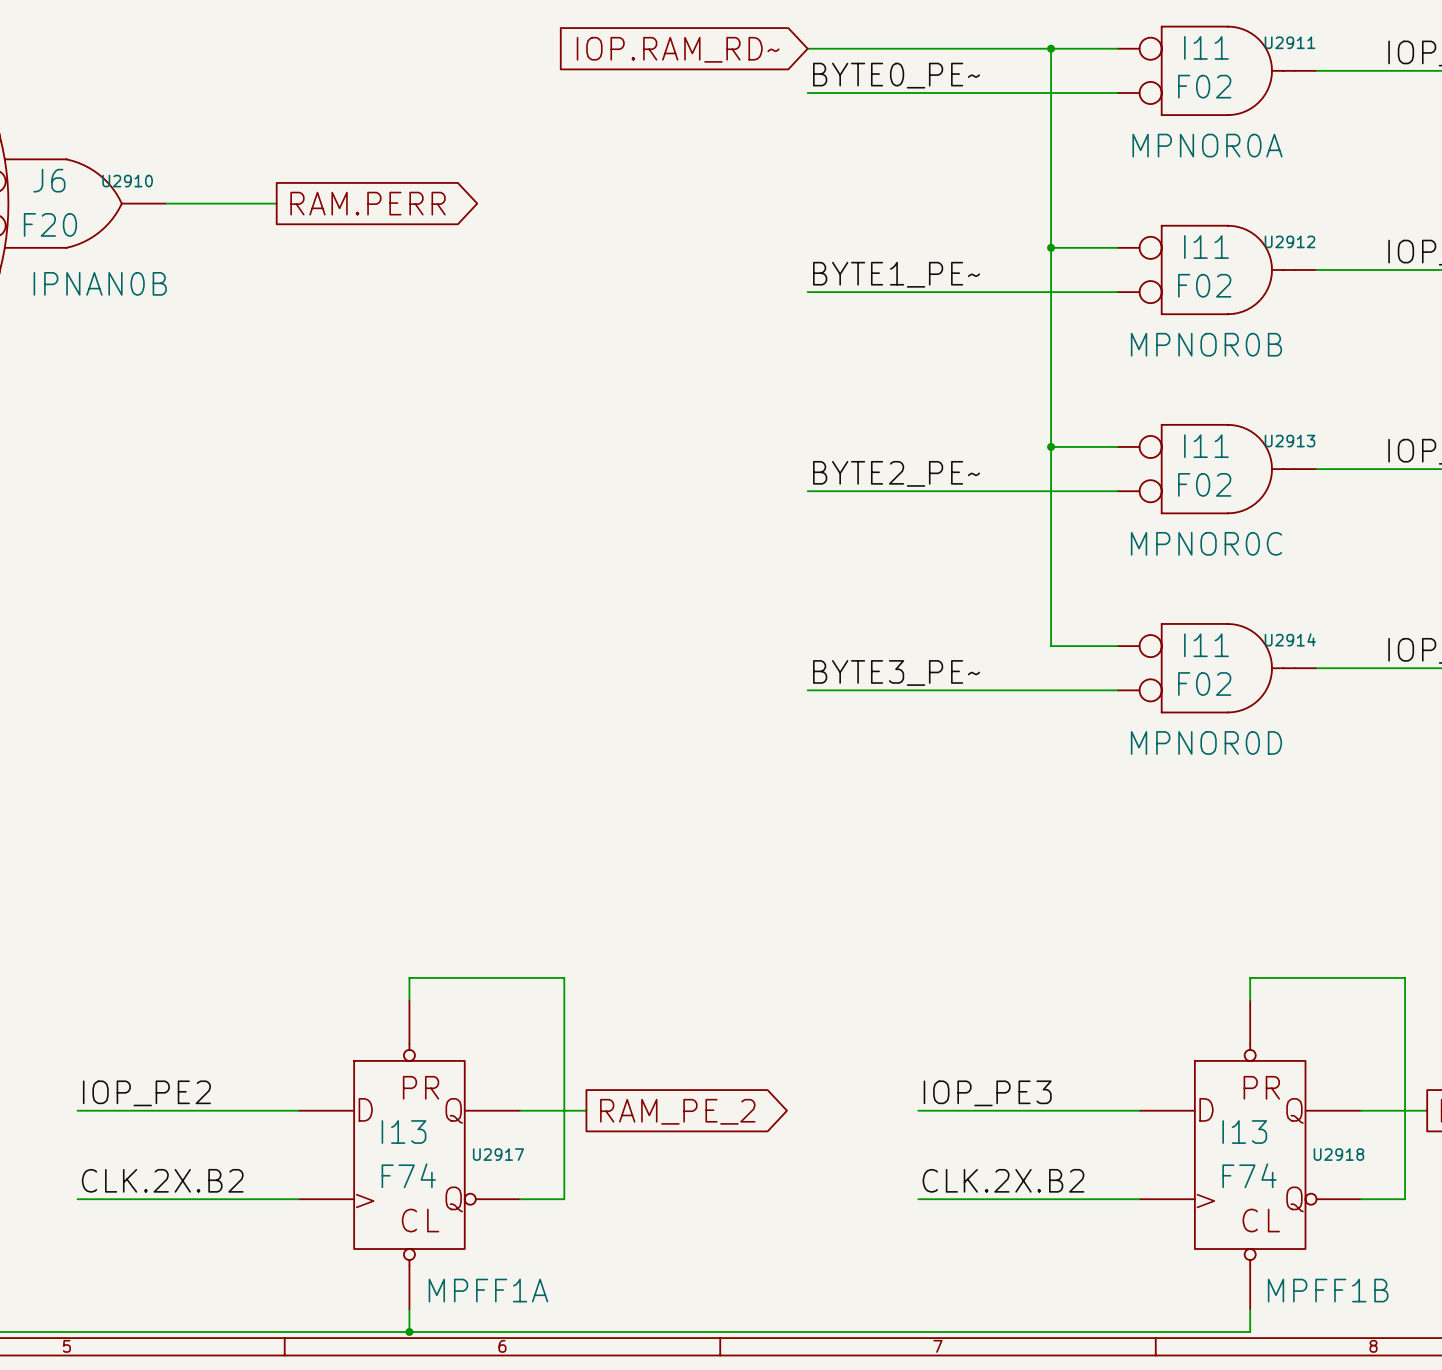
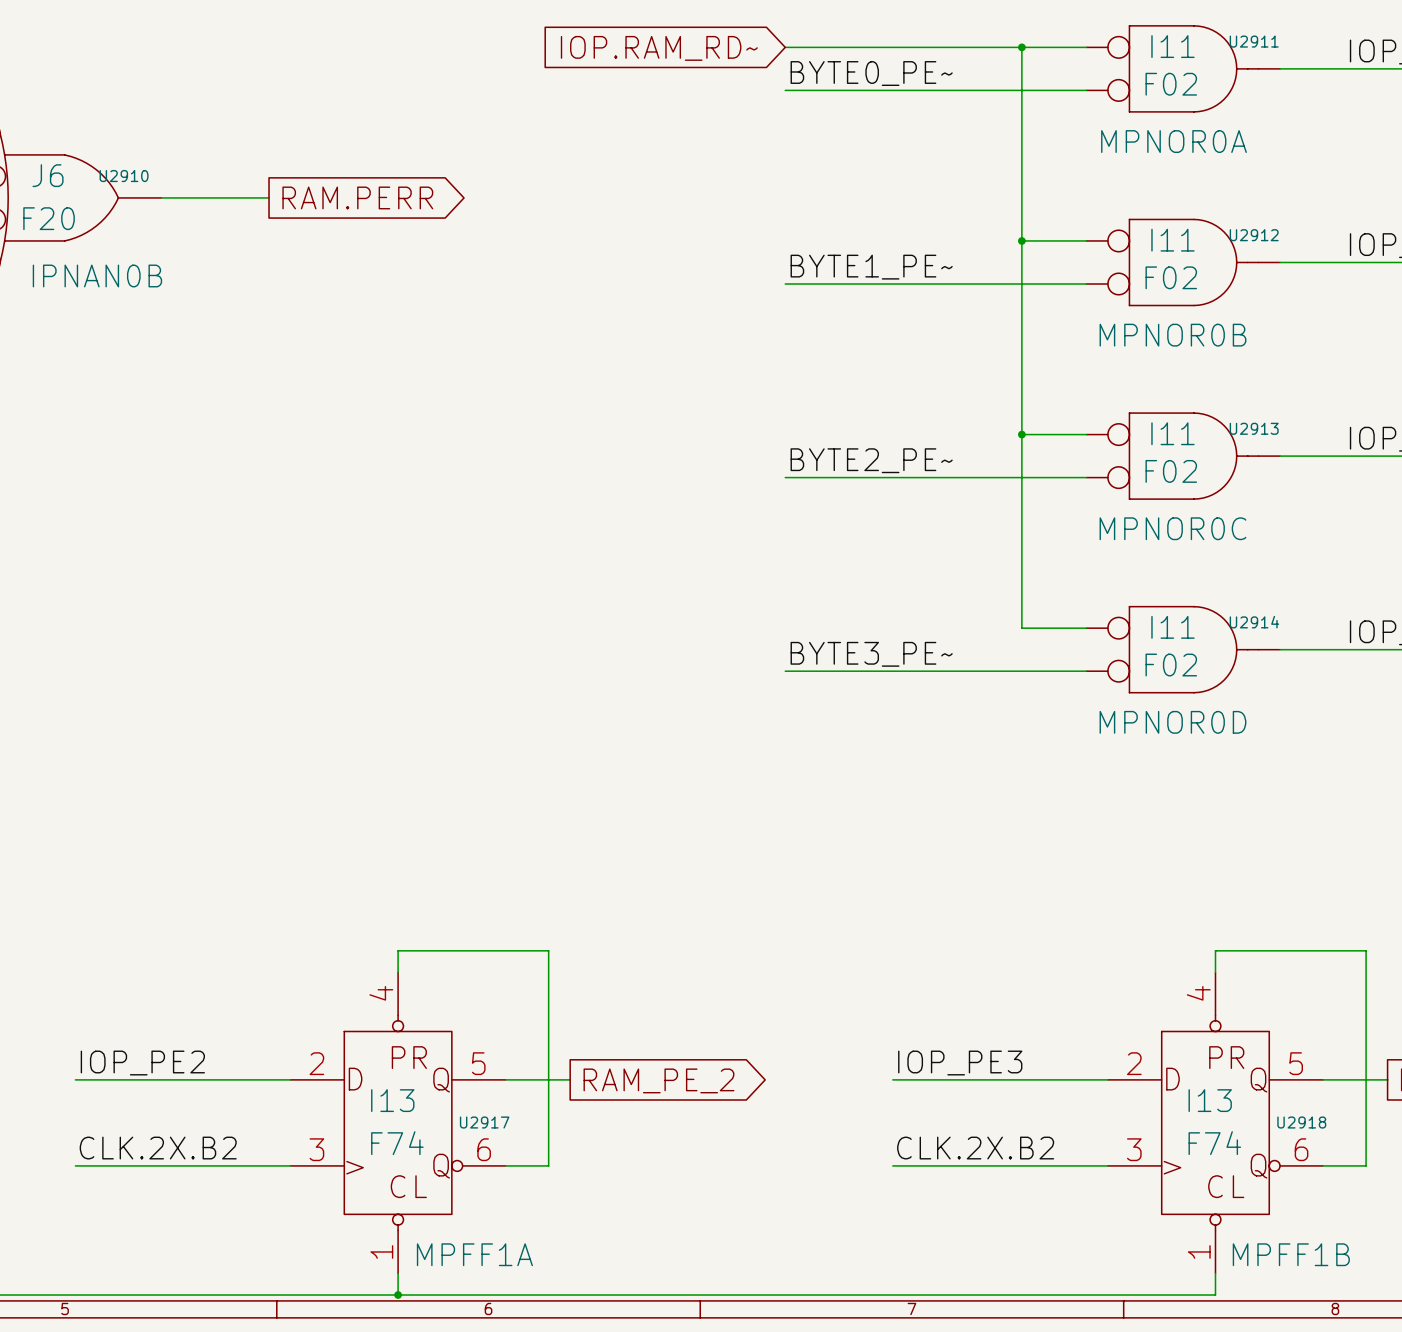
U2917 pin number: none -> 4 (381, 993)
U2918 pin number: none -> 4 (1198, 993)
U2917 pin number: none -> 2 (316, 1063)
U2917 pin number: none -> 5 (478, 1063)
U2918 pin number: none -> 2 (1134, 1063)
U2918 pin number: none -> 5 (1296, 1063)
U2917 pin number: none -> 3 (316, 1149)
U2917 pin number: none -> 6 (484, 1149)
U2918 pin number: none -> 3 (1134, 1149)
U2918 pin number: none -> 6 (1301, 1149)
U2917 pin number: none -> 1 (381, 1251)
U2918 pin number: none -> 1 (1199, 1251)

